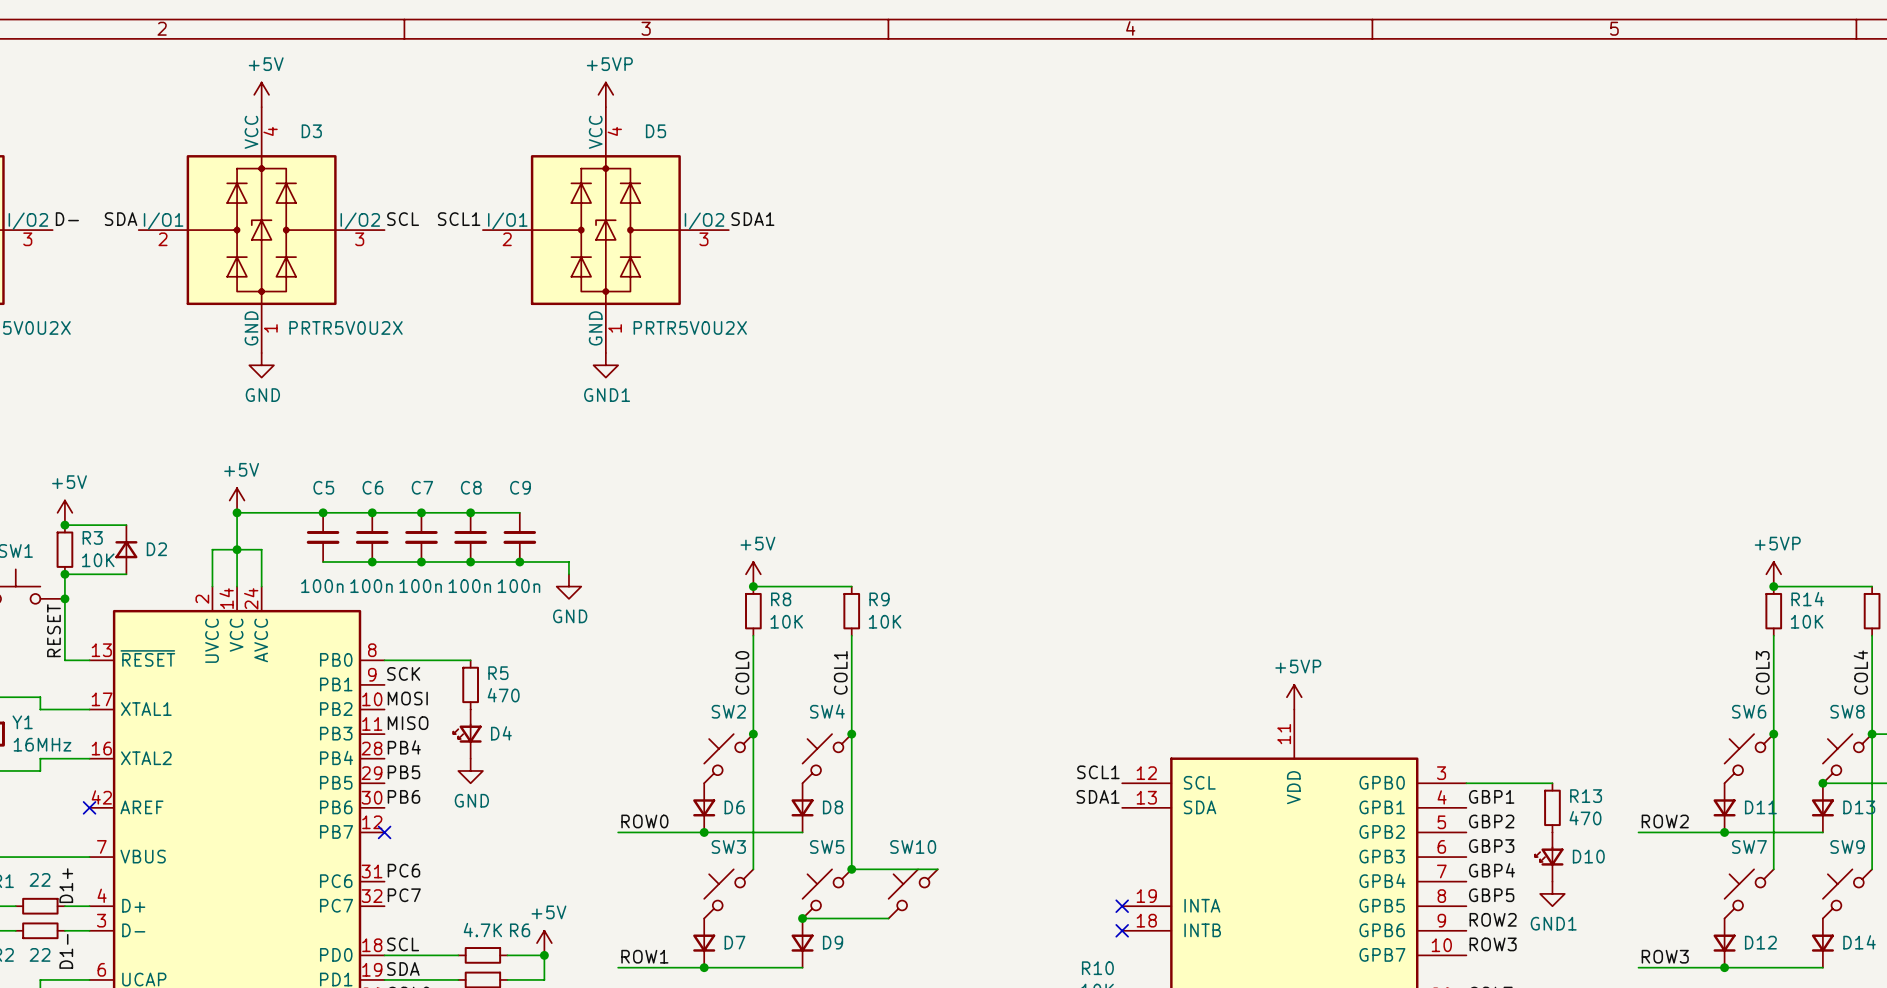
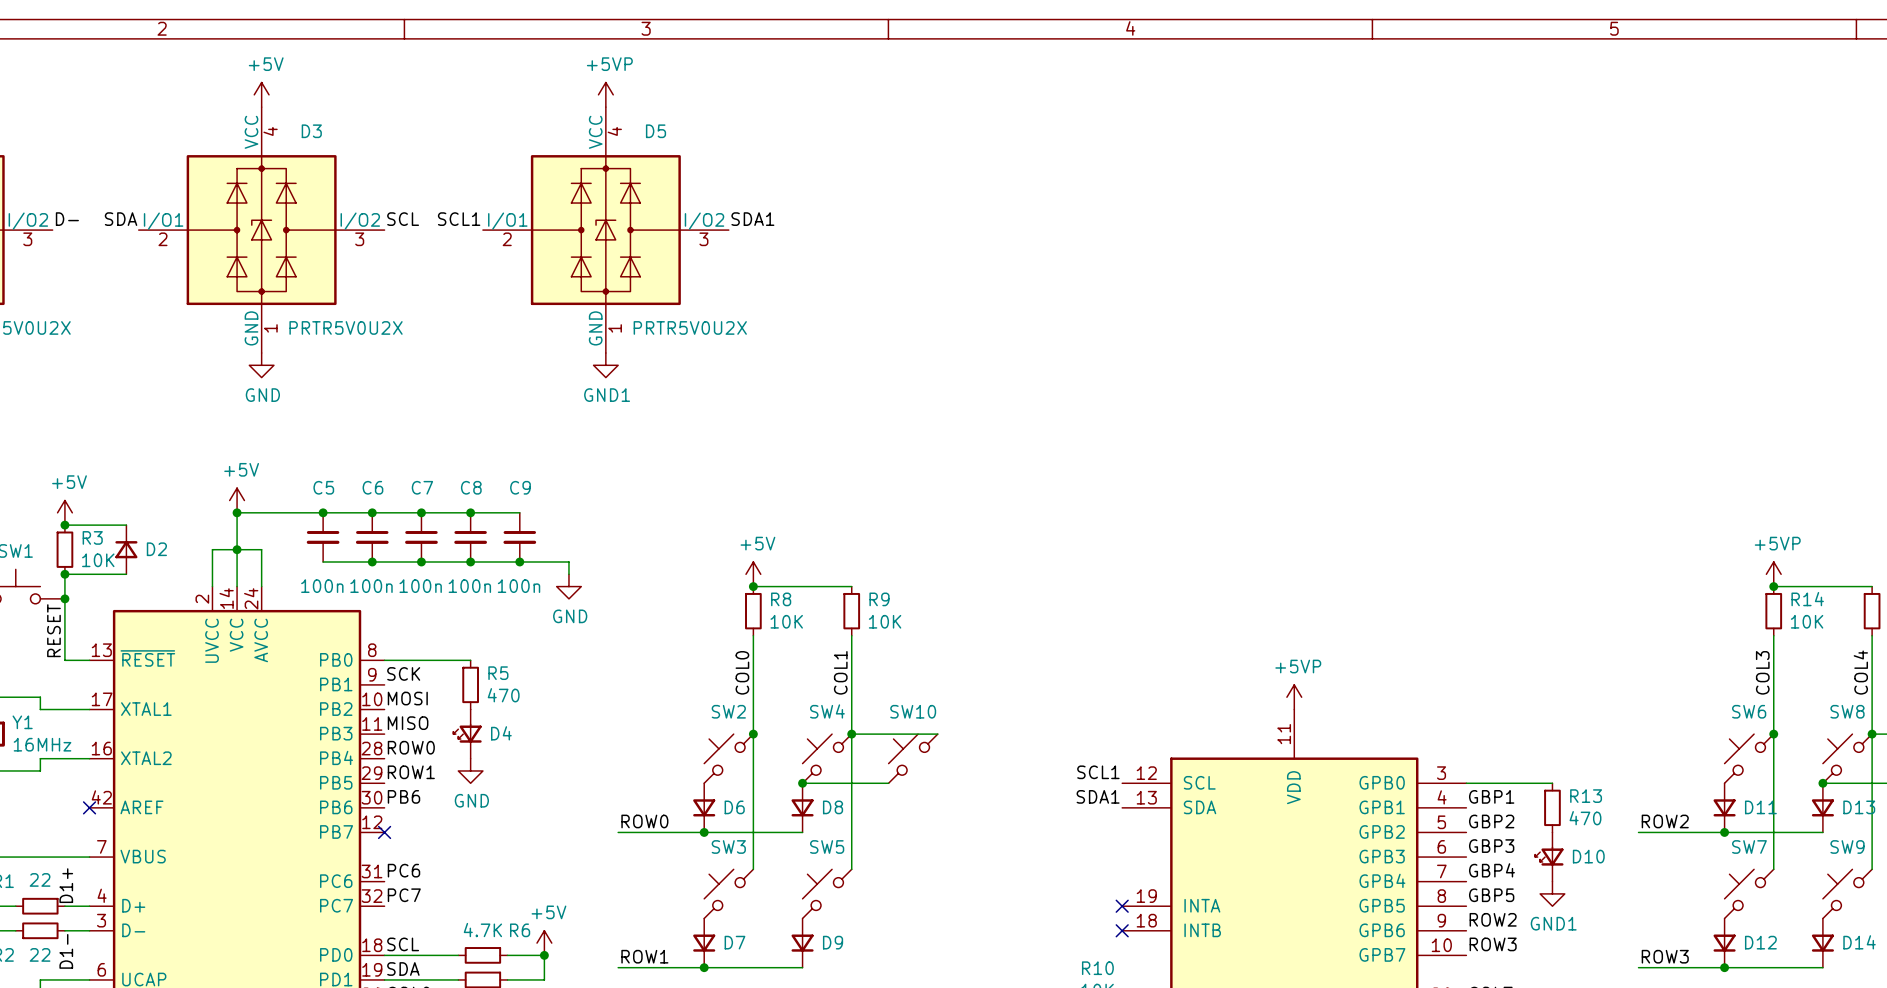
label: PB4 (404, 747) -> ROW0 (411, 747)
label: PB5 (403, 772) -> ROW1 (411, 772)
junction: none -> (802, 783)
wire: (851, 869) (937, 869) -> (802, 783) (888, 783)
junction: (851, 869) -> none
SW10 position: (913, 893) -> (913, 758)
wire: (802, 918) (888, 918) -> (851, 734) (937, 734)
junction: (802, 918) -> none

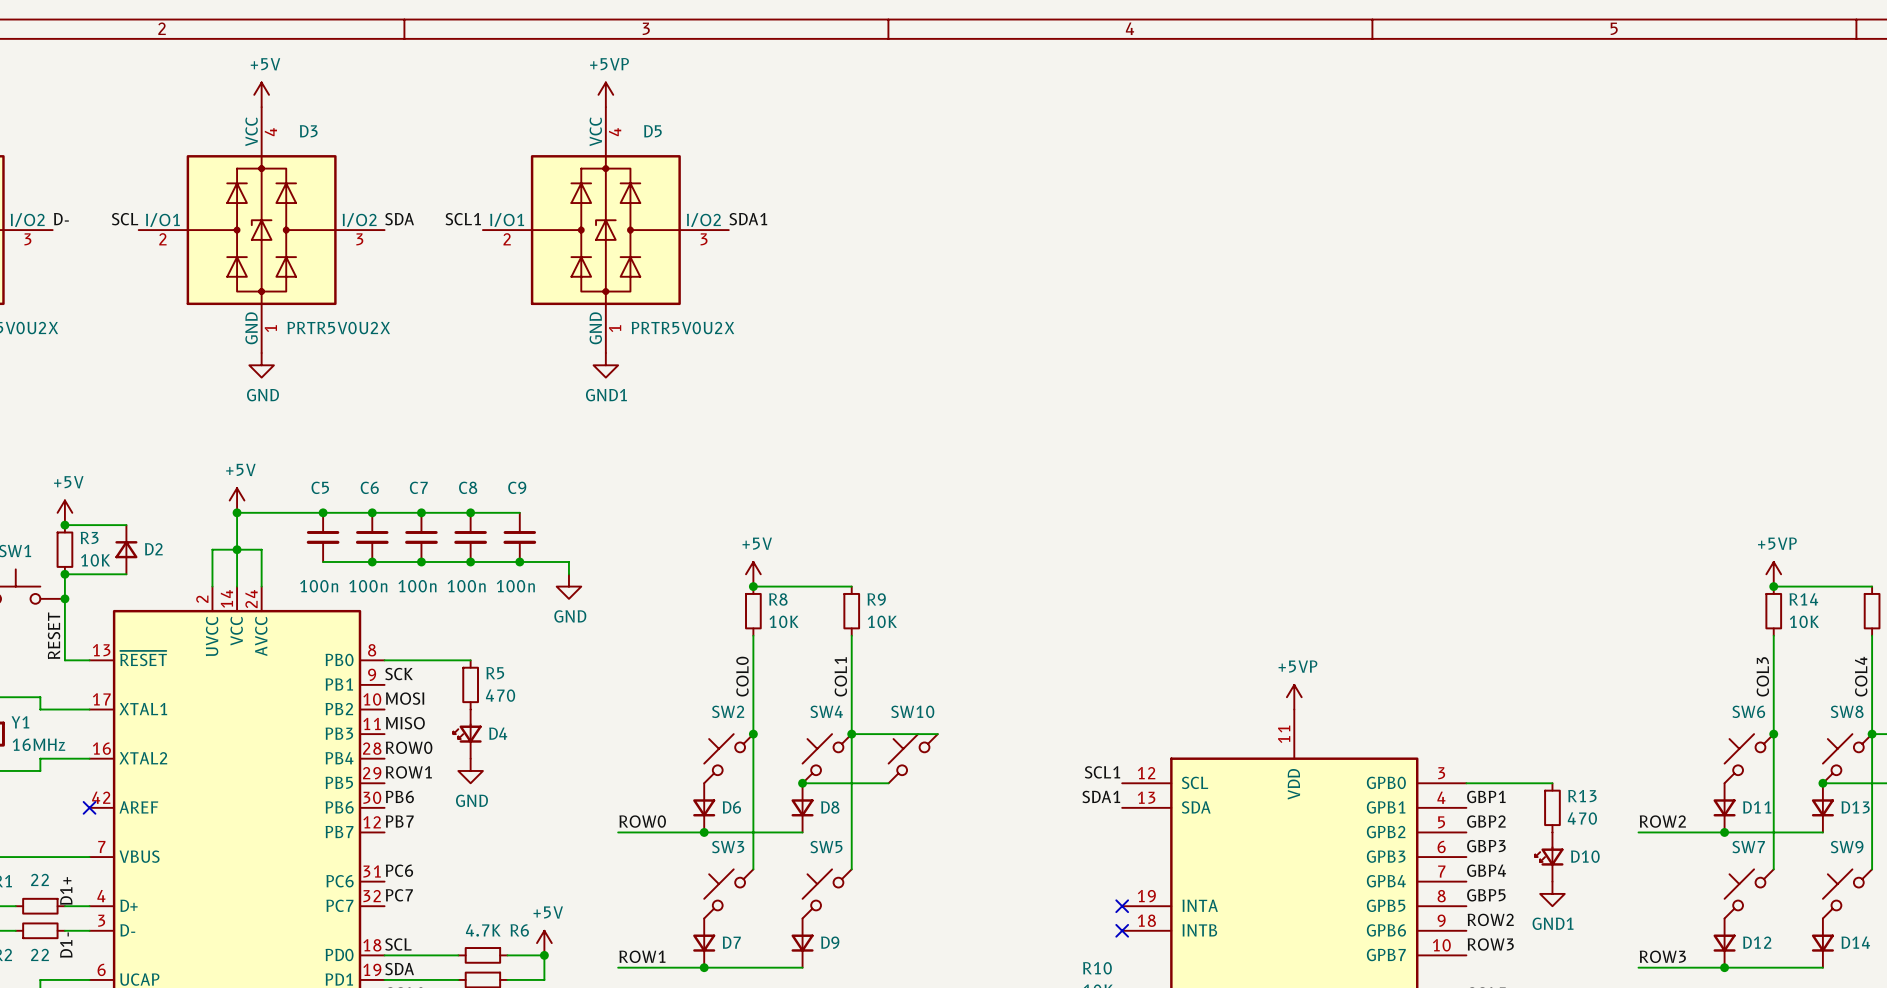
label: SDA (121, 219) -> SCL (125, 219)
label: SCL (403, 219) -> SDA (399, 219)
label: none -> PB7 (399, 821)
no-connect mark: (384, 832) -> none

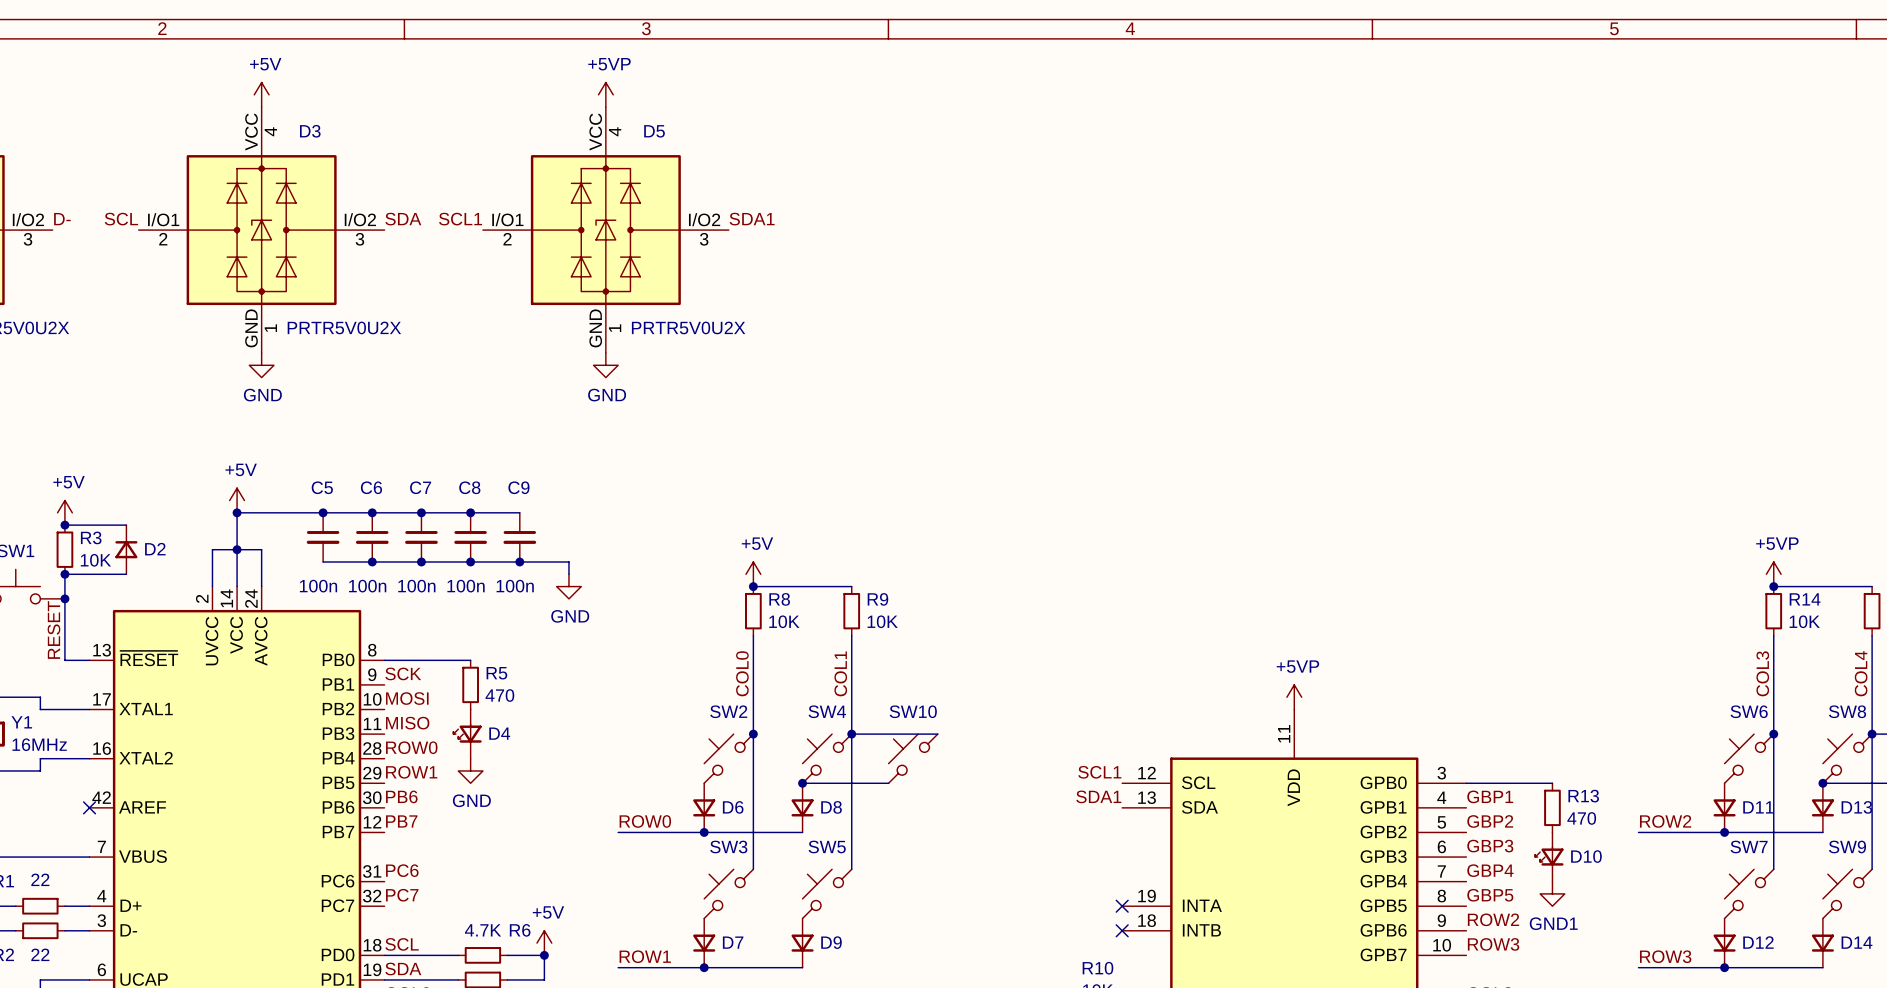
power symbol: GND1 (605, 365) -> GND (605, 365)
label: D1+ (66, 890) -> none
label: D1- (66, 945) -> none

